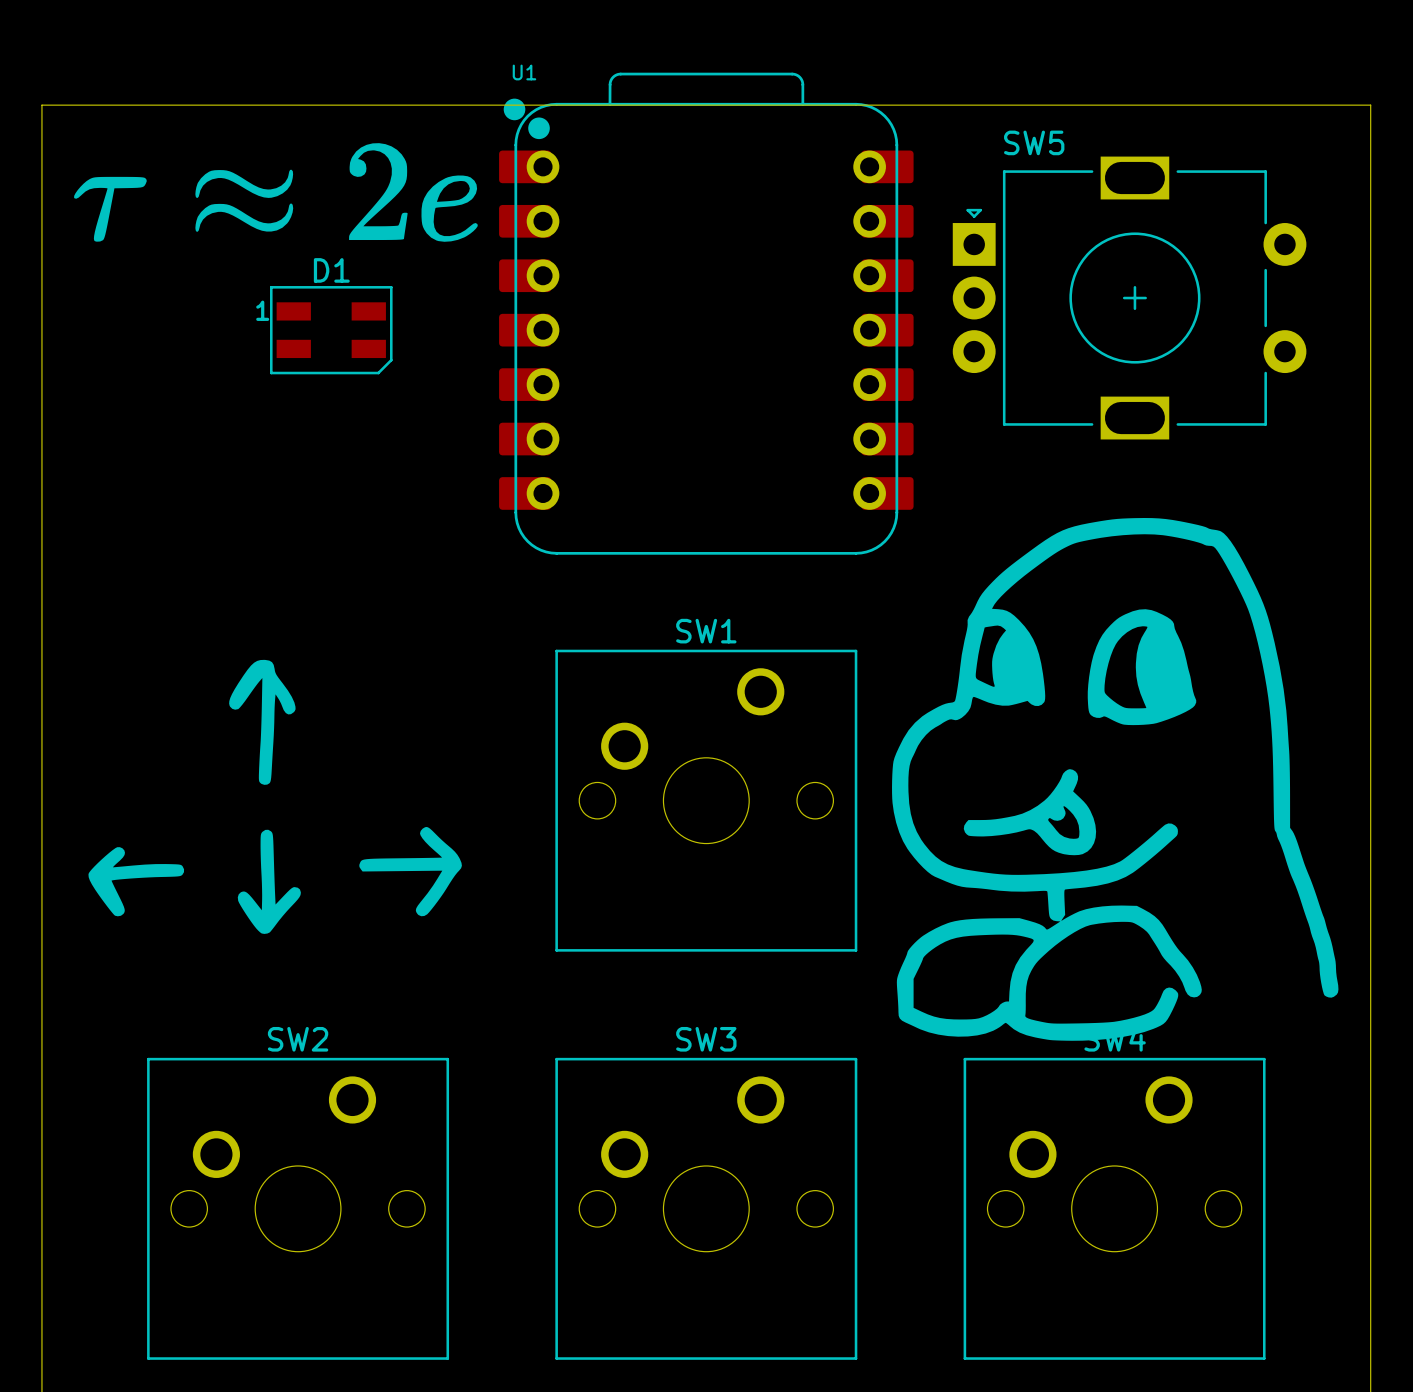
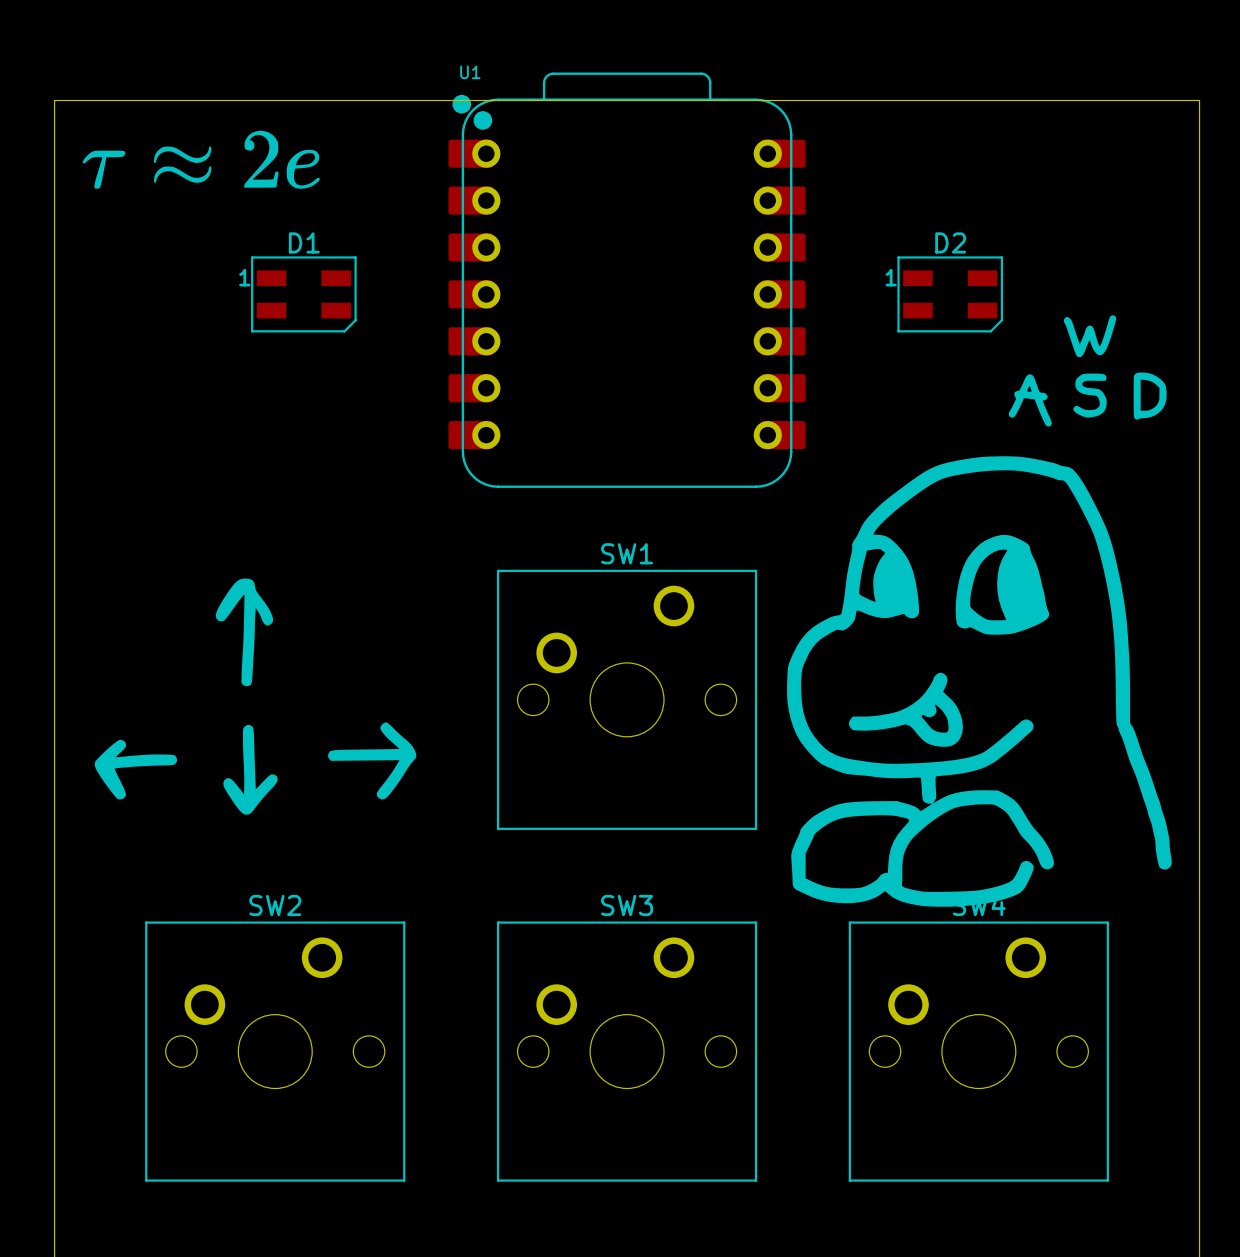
drawing: none -> [82, 130, 320, 189]
drawing: [74, 143, 478, 242] -> none
SW5: (1129, 298) -> none
D2: none -> (950, 294)
drawing: none -> [1008, 315, 1167, 427]

